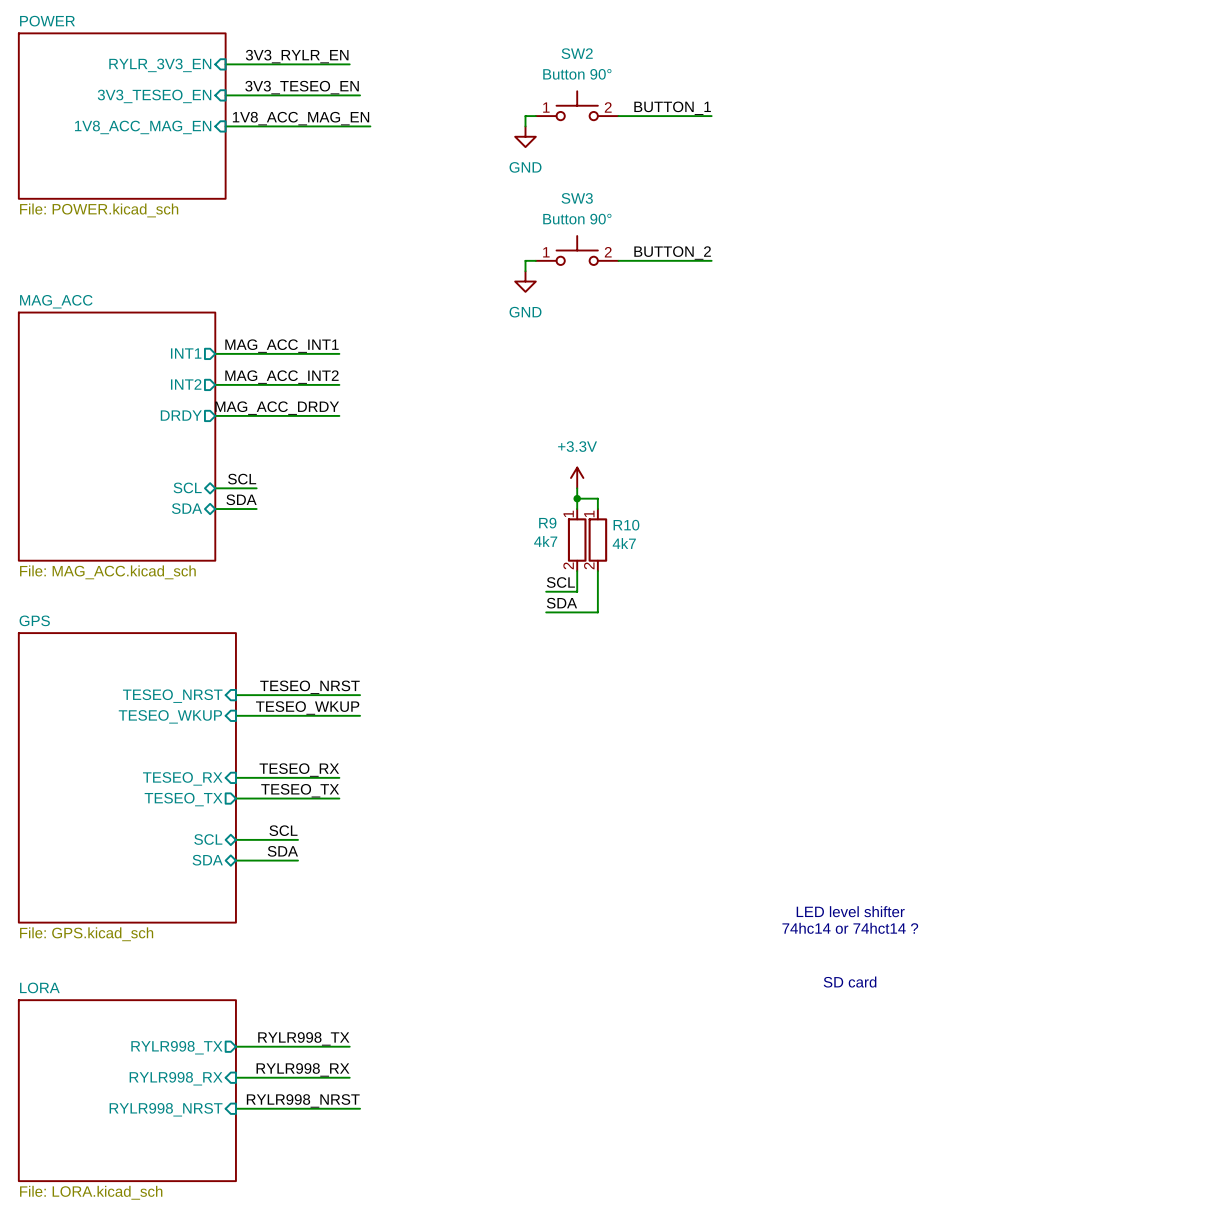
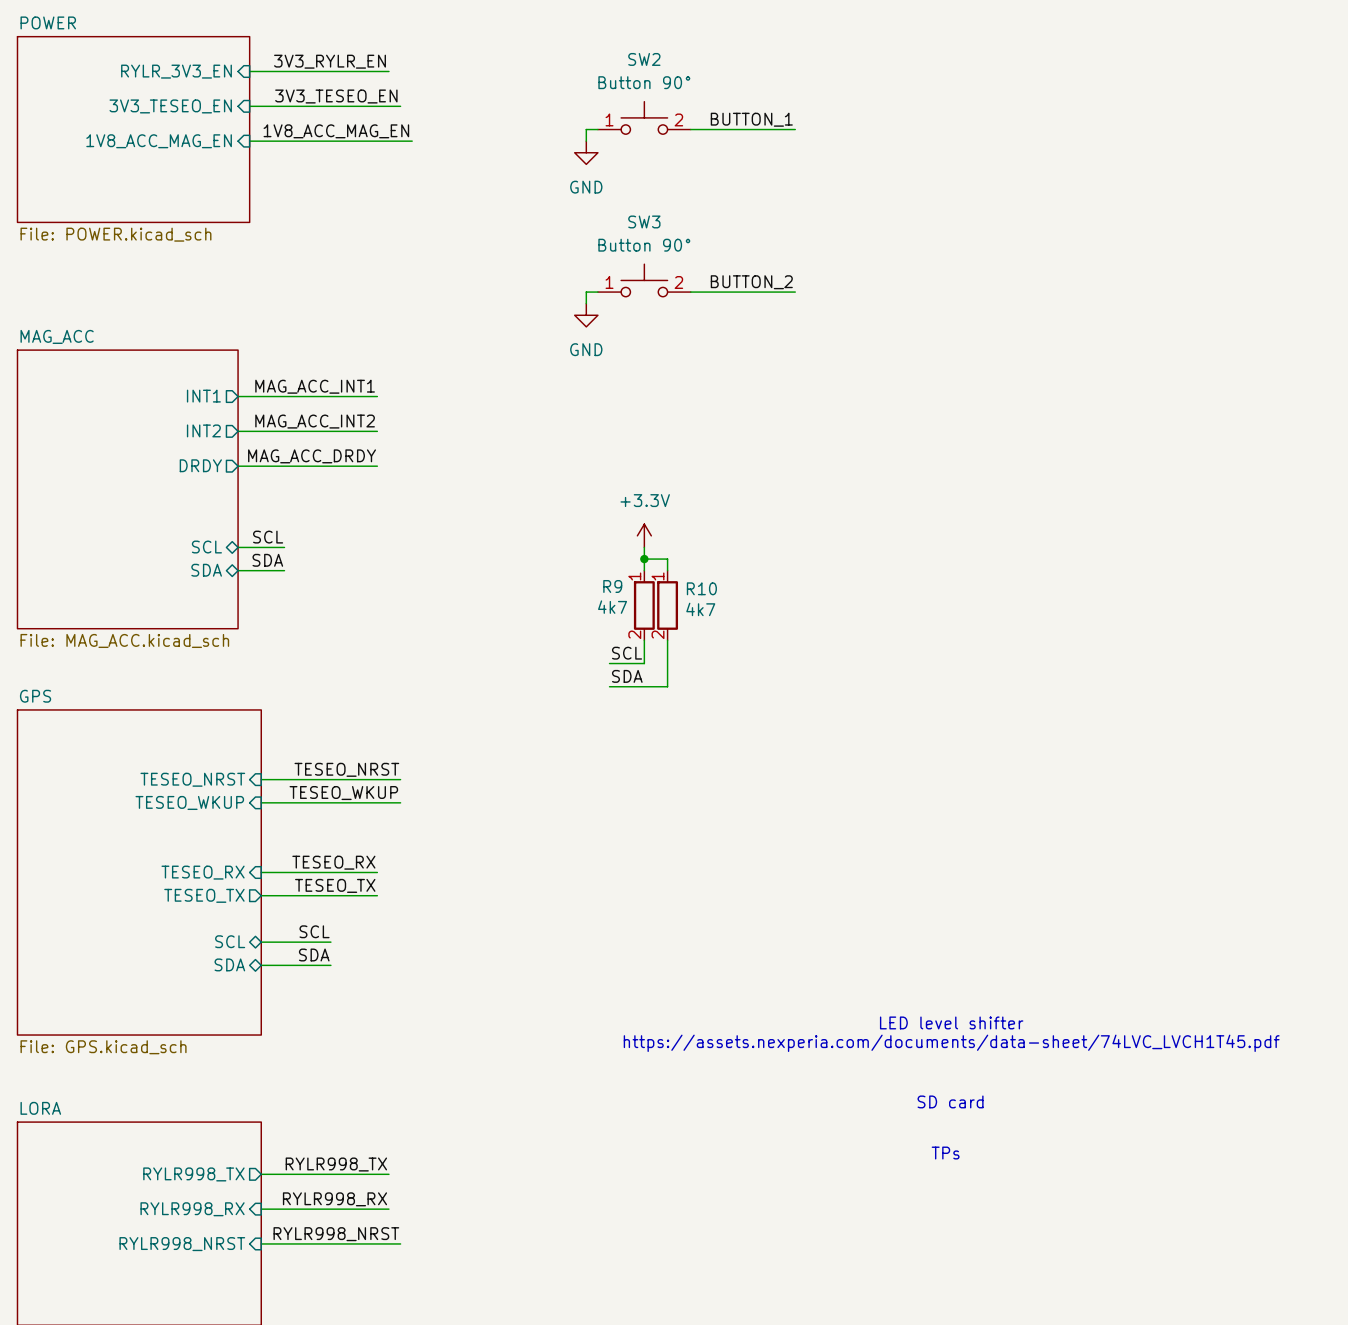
text: 74hc14 or 74hct14 ? (850, 928) -> https://assets.nexperia.com/documents/data-sheet/74LVC_LVCH1T45.pdf (951, 1043)
text: none -> TPs (945, 1153)

